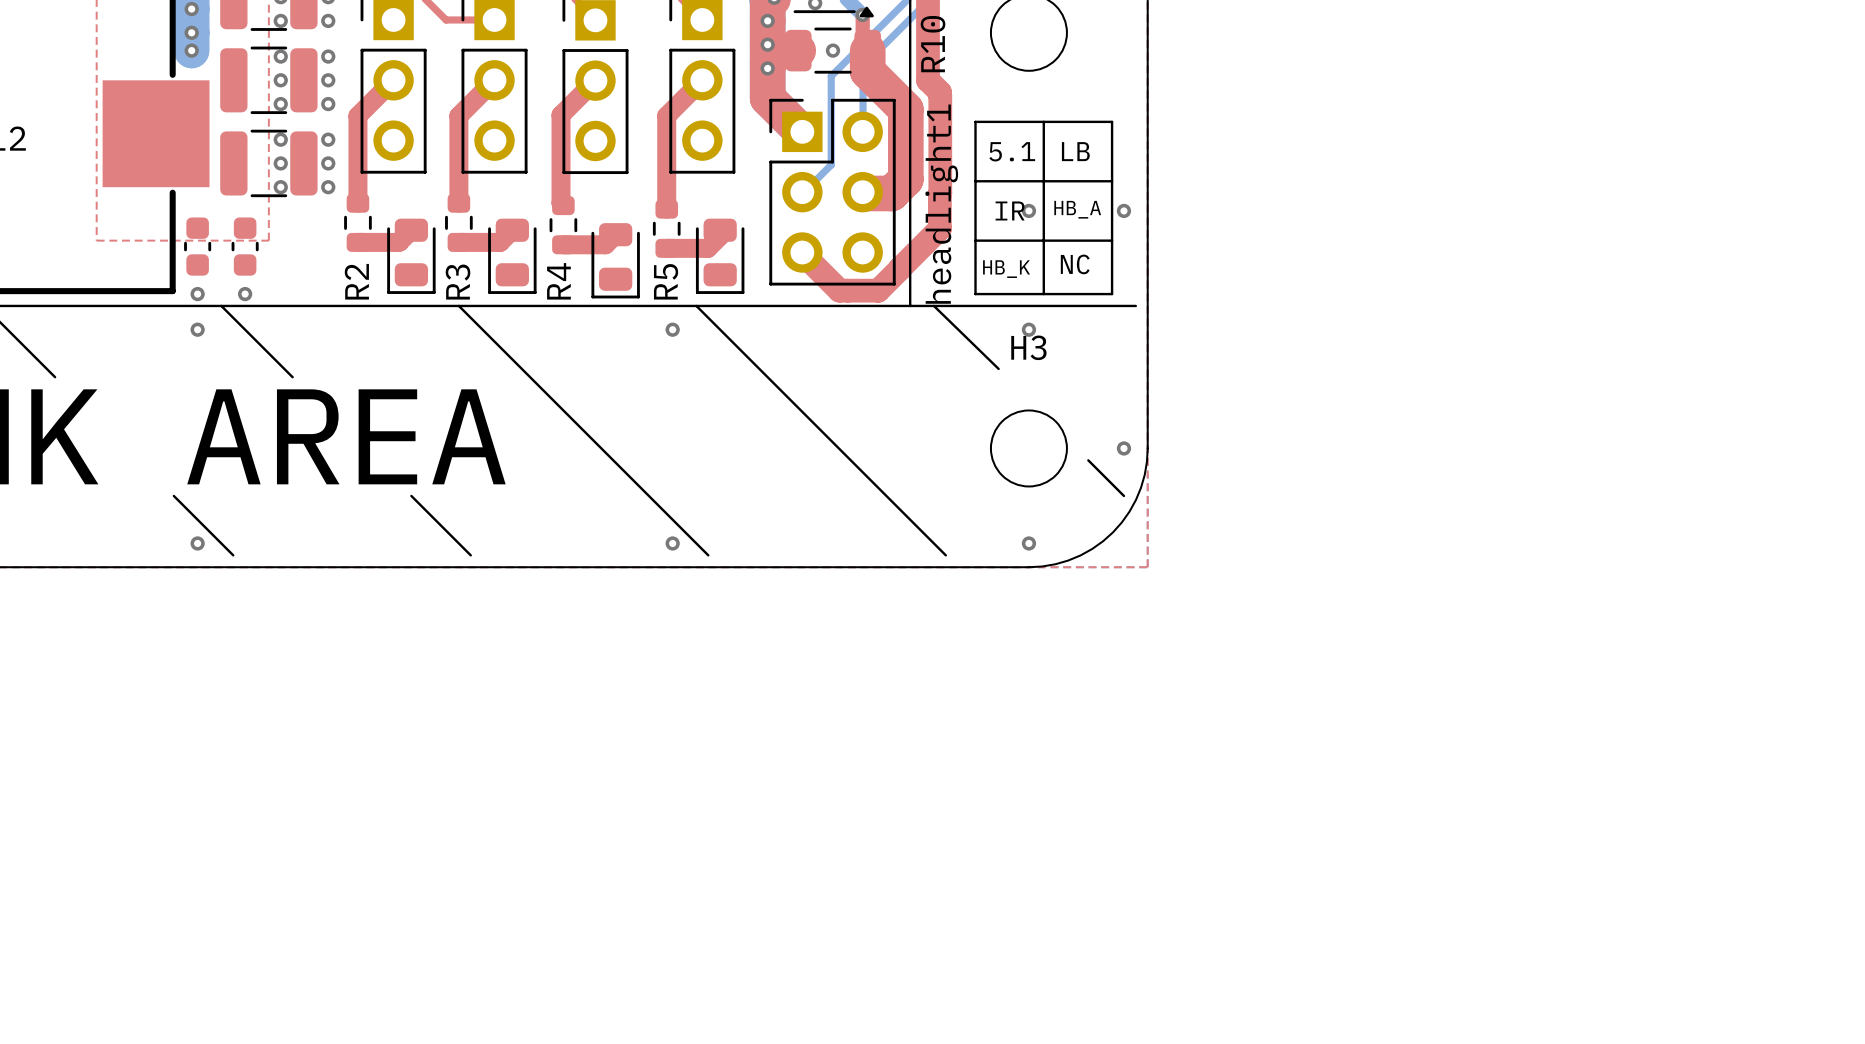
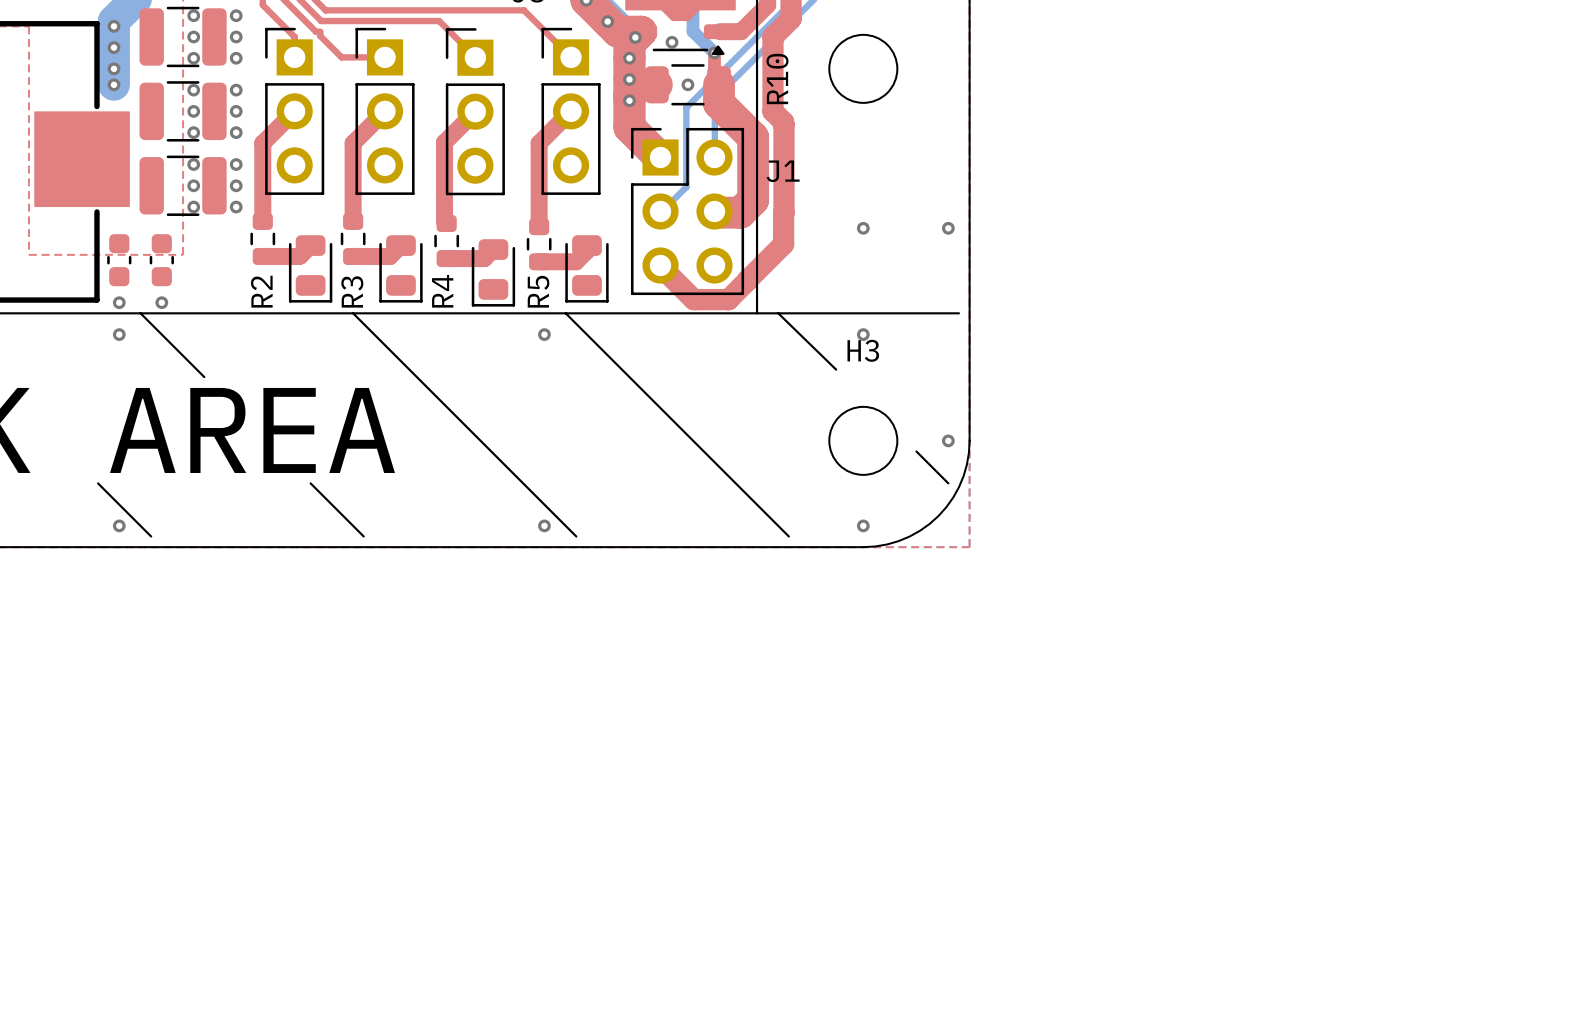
line: (975, 121) (1112, 121) (1112, 294) (975, 294) (975, 121) -> none
line: (1043, 121) (1043, 294) -> none
text: 5.1 (1012, 151) -> none
text: LB (1075, 151) -> none
line: (975, 181) (1112, 181) -> none
headlight1 name: headlight1 (941, 204) -> J1 (783, 171)
text: HB_A (1077, 209) -> none
text: IR (1010, 210) -> none
line: (975, 240) (1112, 240) -> none
text: NC (1075, 264) -> none
text: HB_K (1006, 269) -> none

